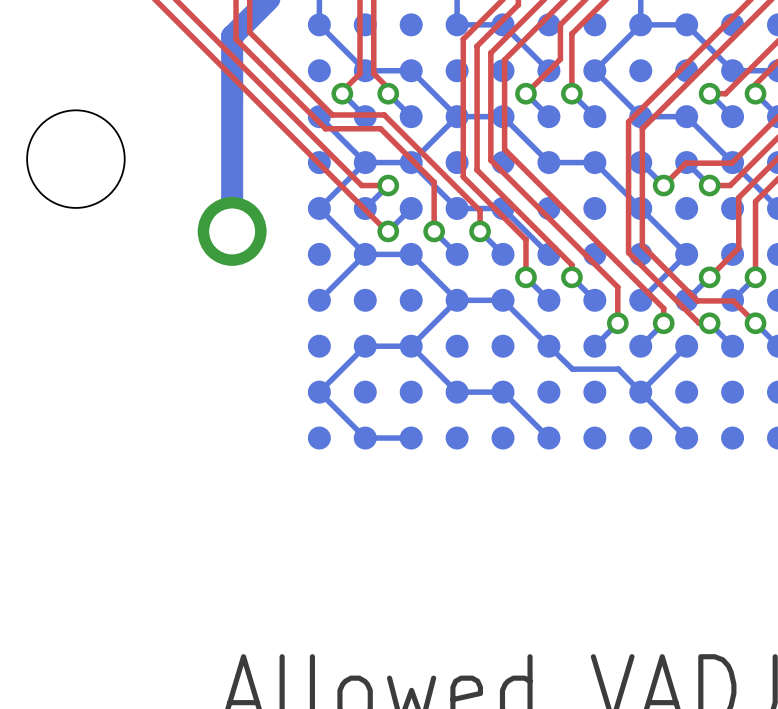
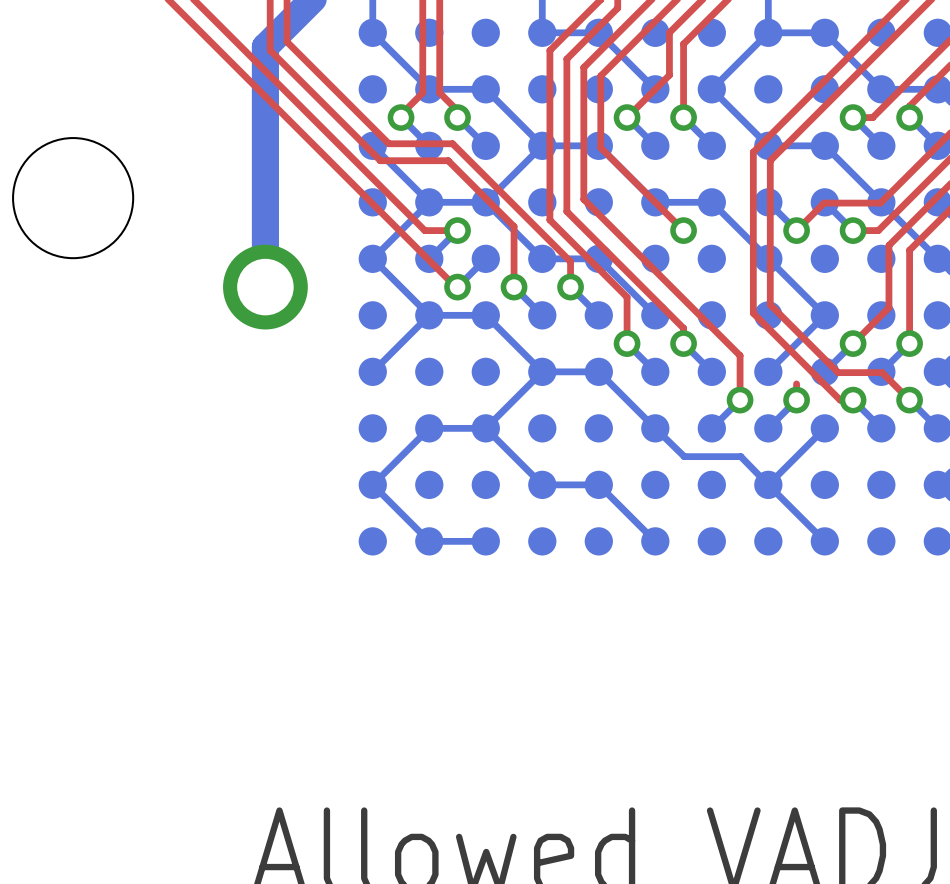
top track: (504, 118) (504, 149) (663, 310) -> (600, 147) (683, 230)
via: none -> (683, 230)

